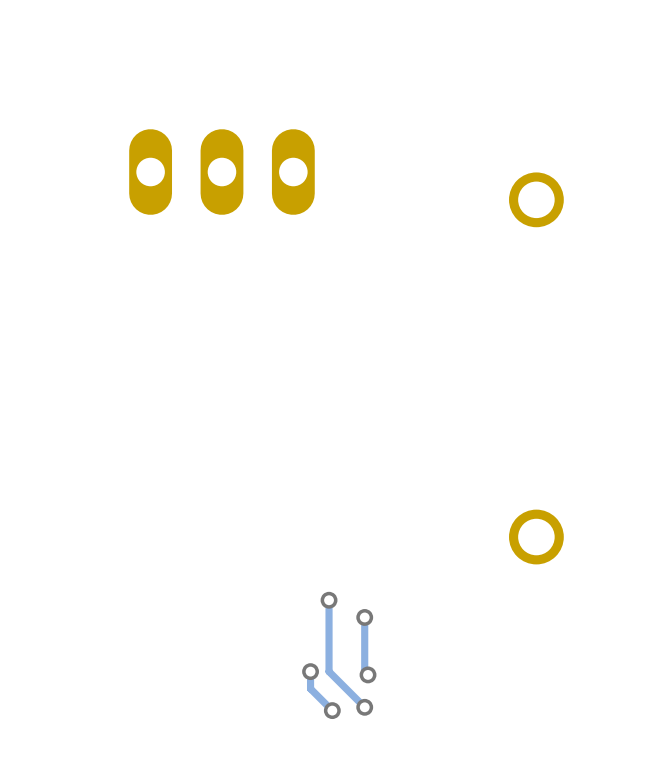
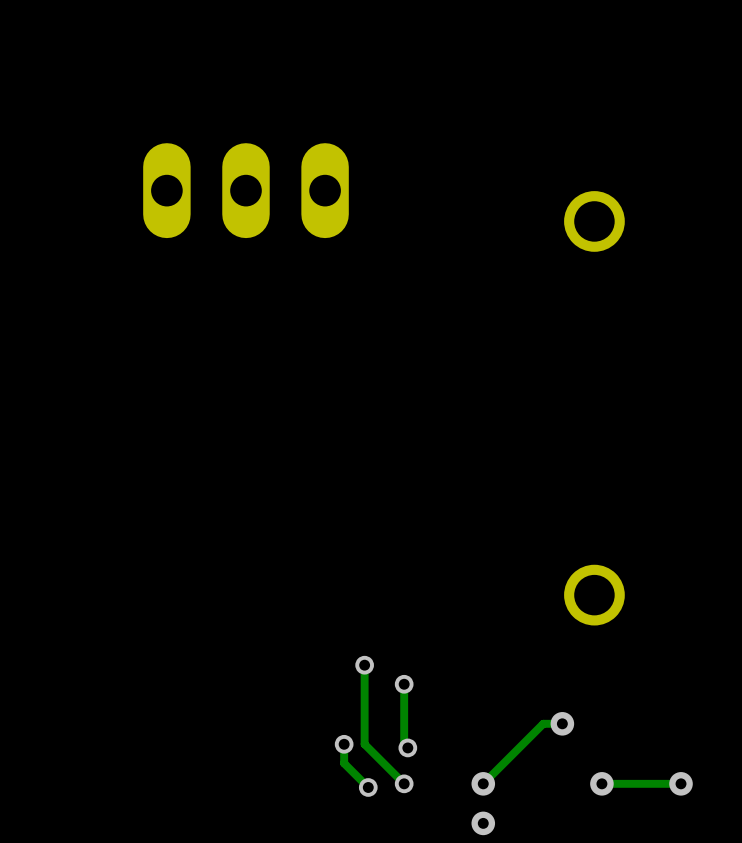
track: none -> (562, 723) (543, 723) (483, 783)
via: none -> (562, 723)
via: none -> (483, 783)
via: none -> (601, 783)
track: none -> (681, 783) (601, 783)
via: none -> (681, 783)
via: none -> (483, 823)

